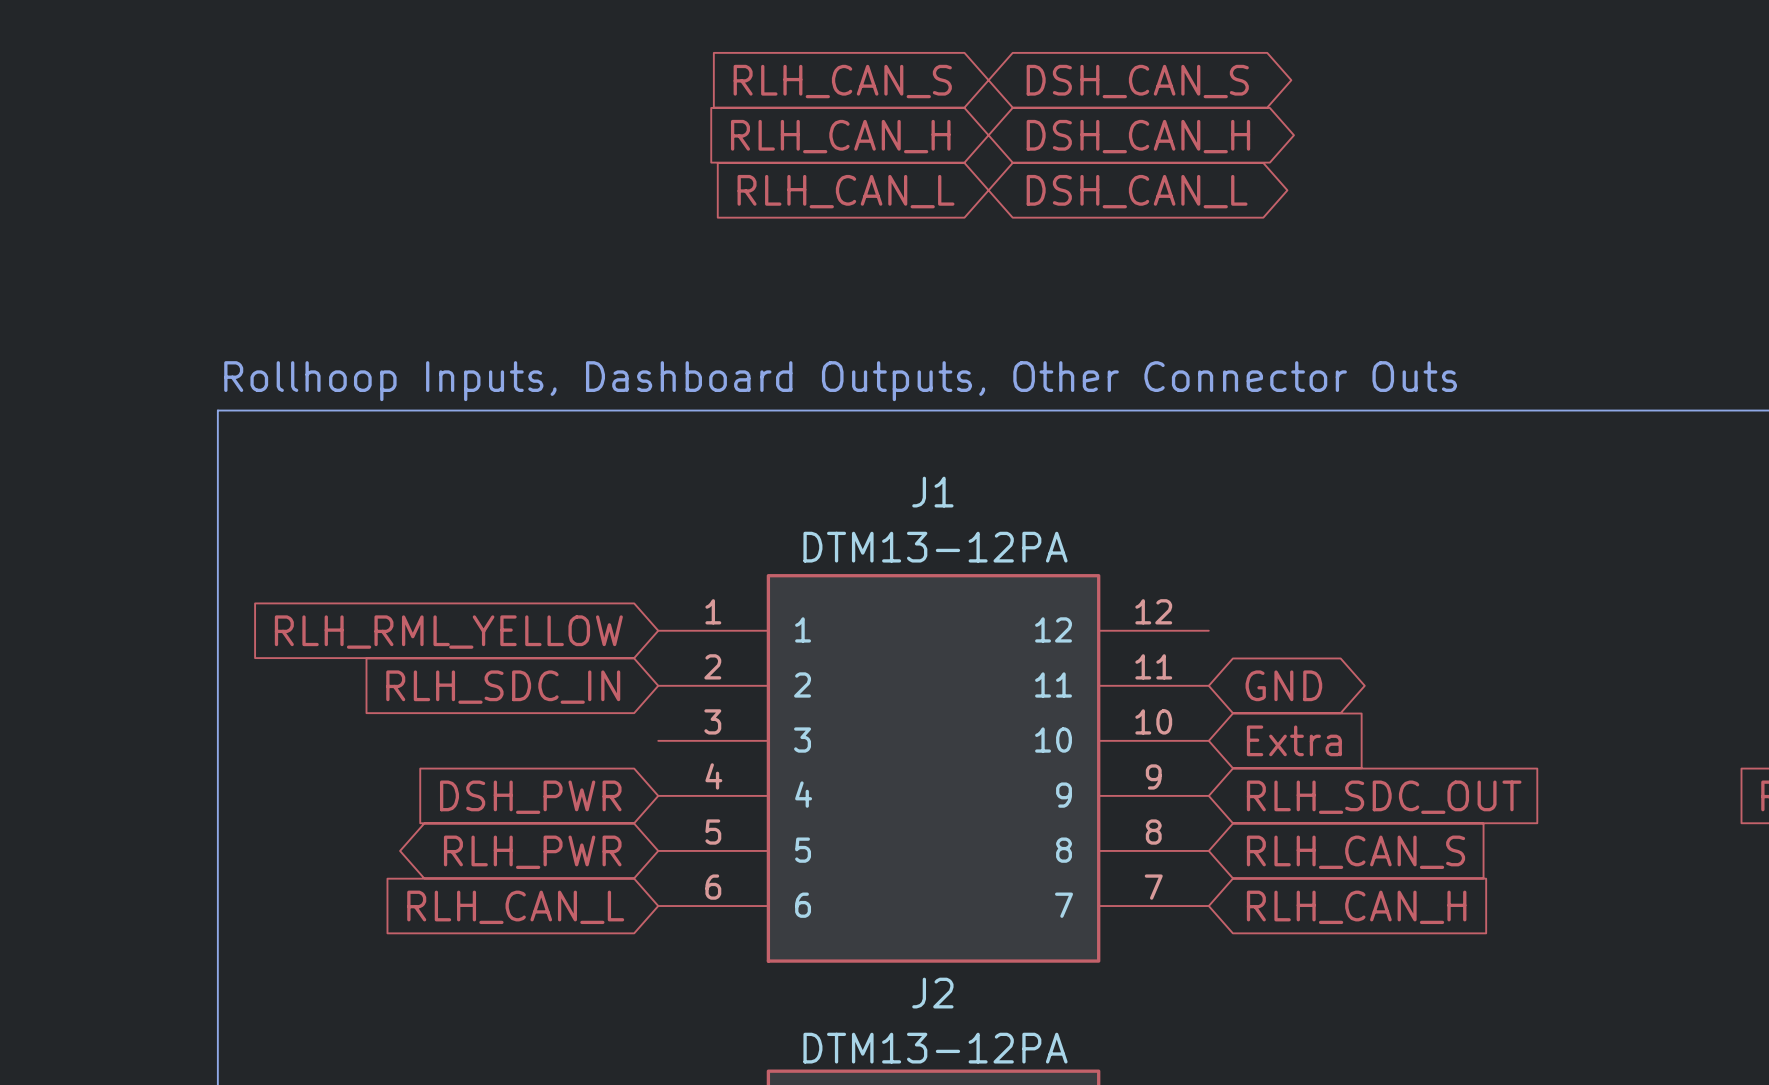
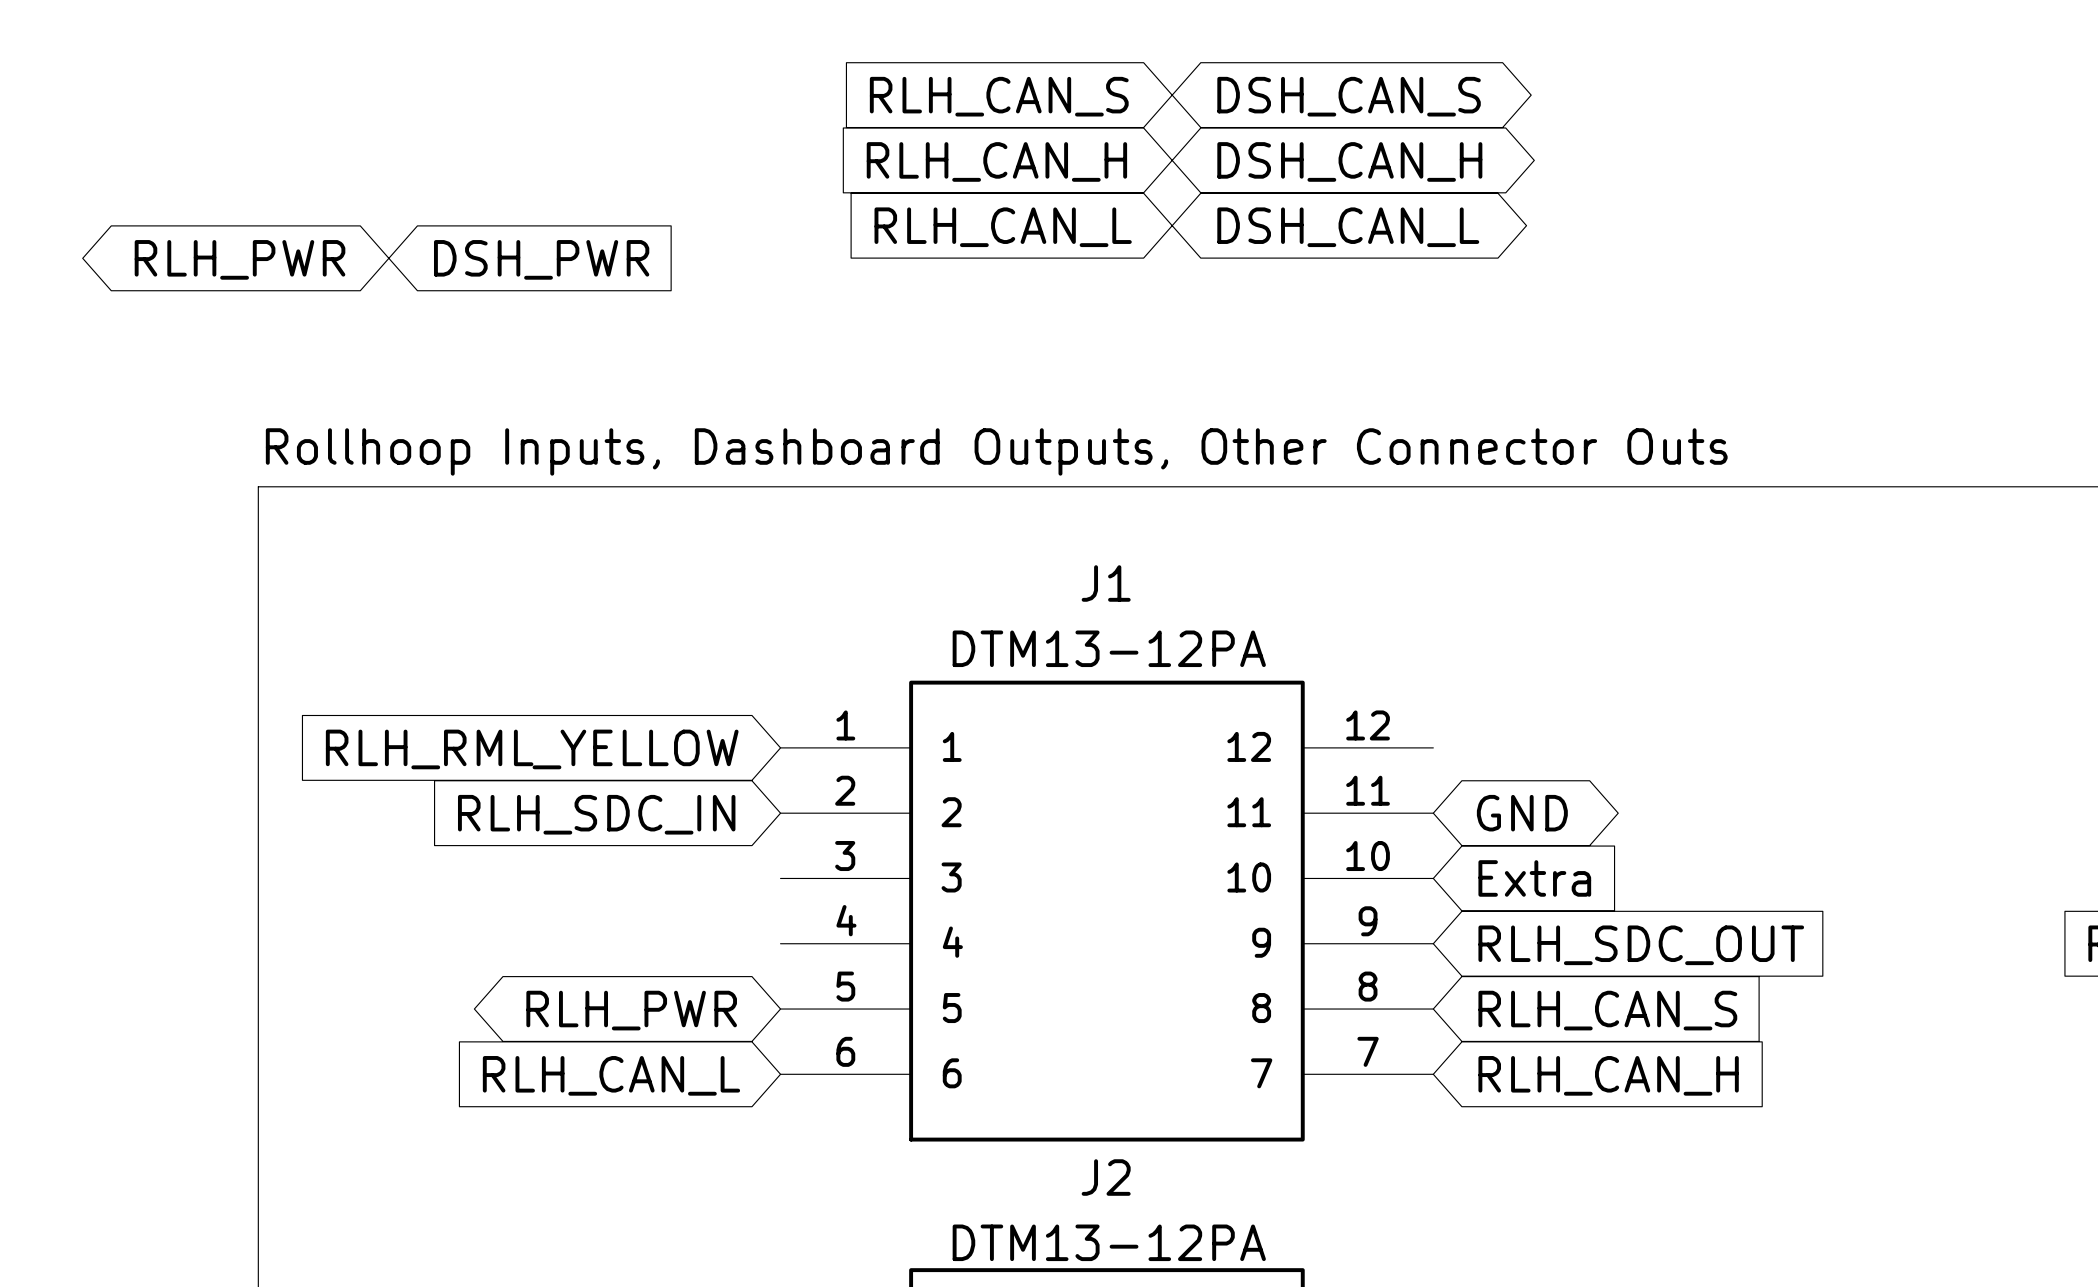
global label: none -> RLH_PWR (240, 259)
global label: none -> DSH_PWR (541, 259)
global label: DSH_PWR (530, 797) -> none

